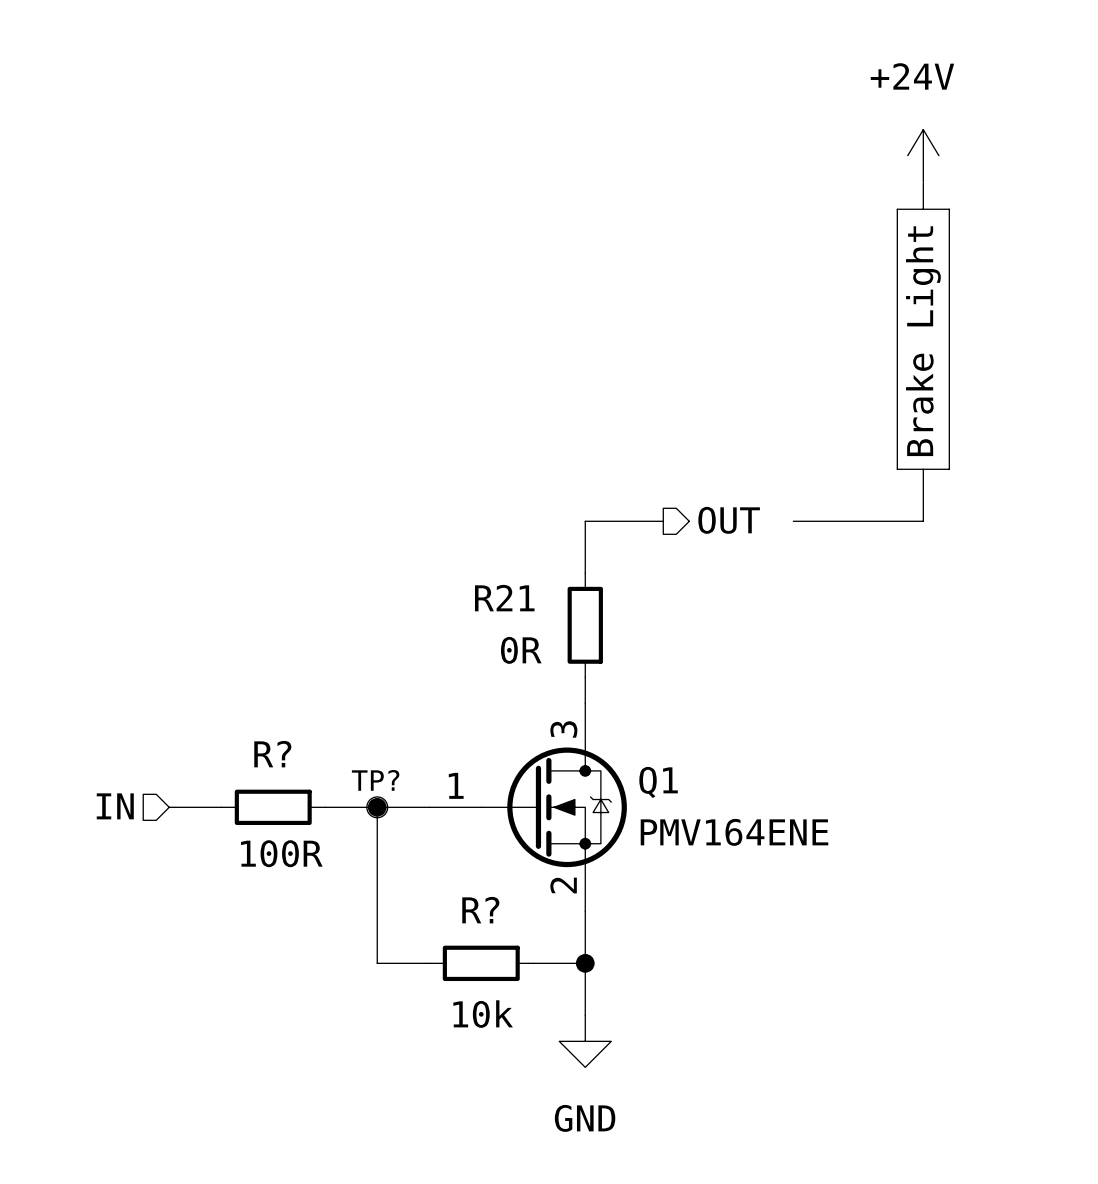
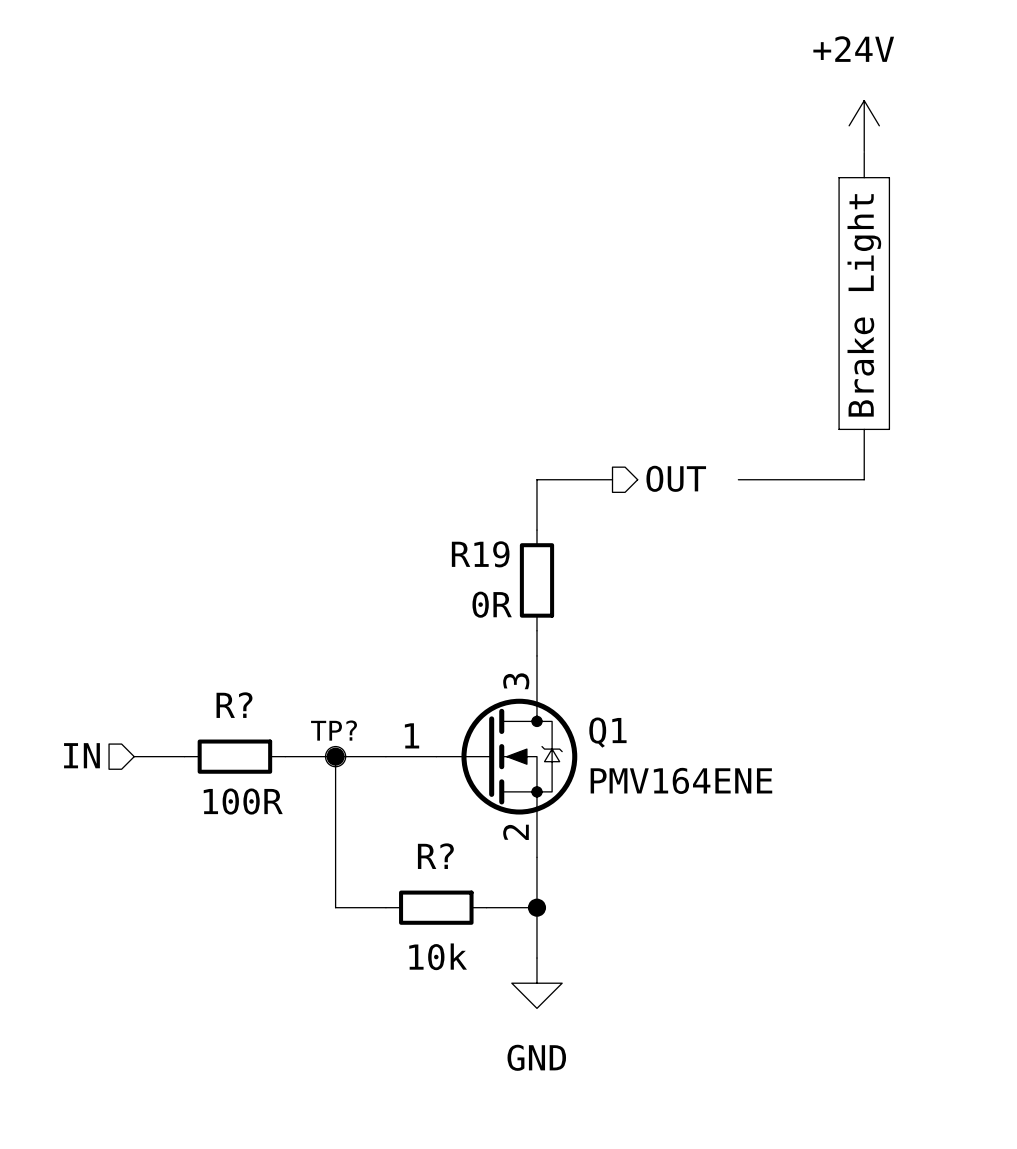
R21 name: R21 (504, 598) -> R19 (480, 554)
R21 value position: 0R (521, 650) -> 0R (492, 604)

